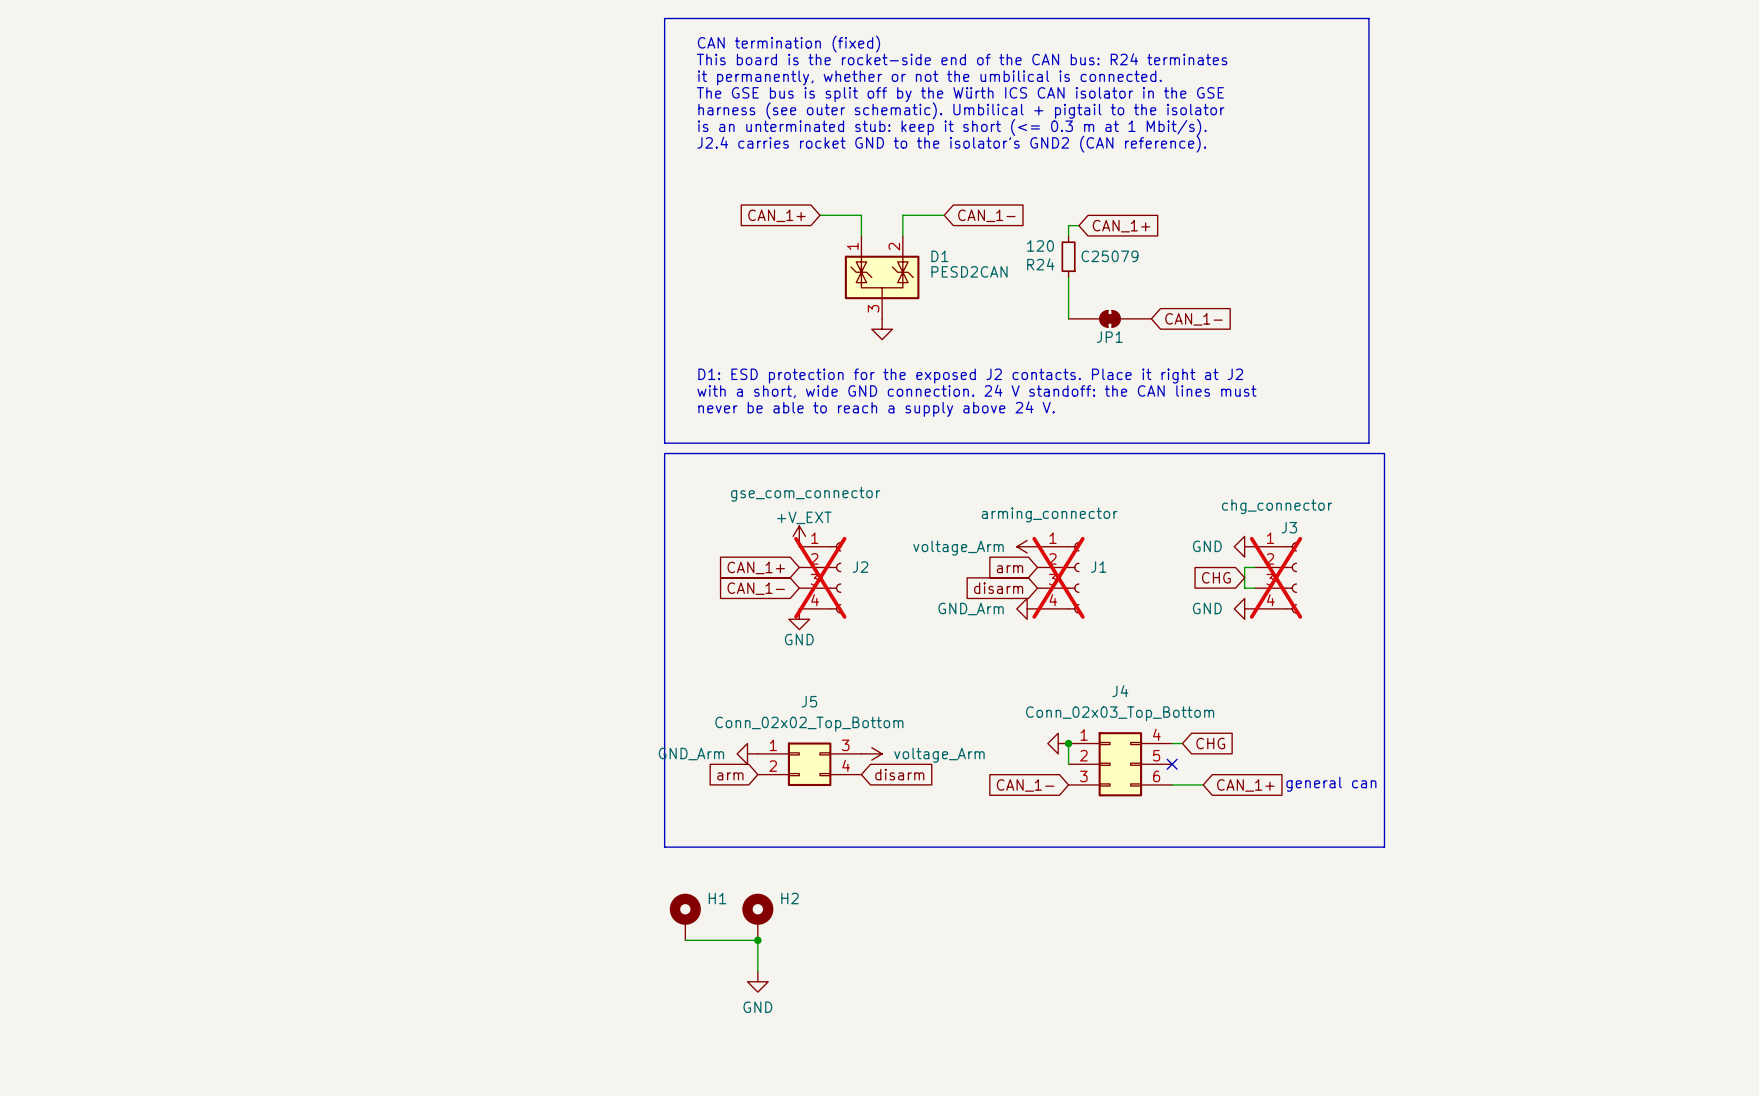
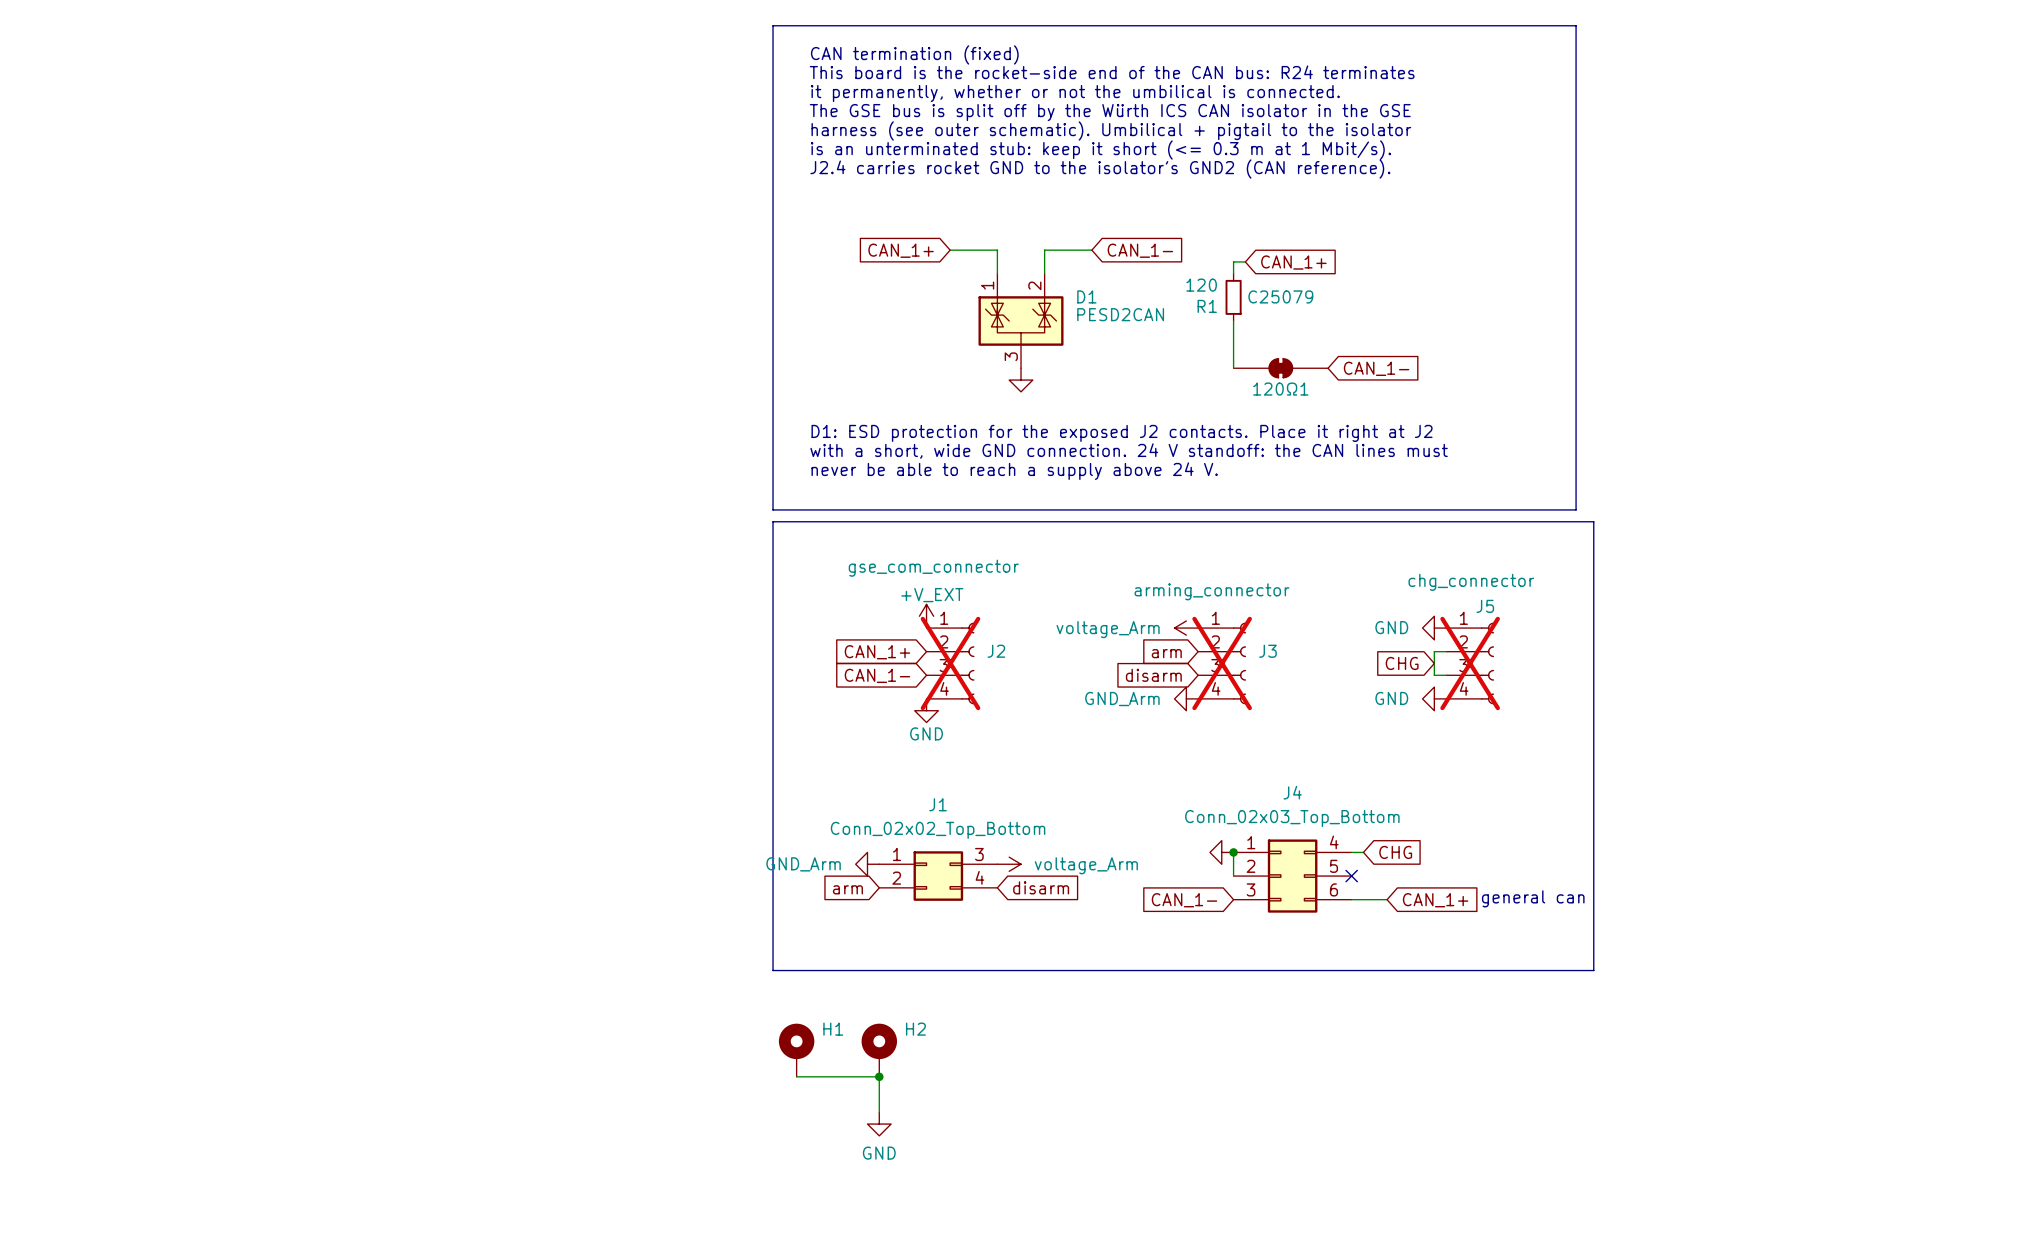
R24 name: R24 (1040, 264) -> R1 (1207, 306)
JP1 name: JP1 (1109, 337) -> 120Ω1 (1280, 389)
J3 name: J3 (1289, 527) -> J5 (1485, 606)
J1 name: J1 (1098, 567) -> J3 (1267, 651)
J5 name: J5 (809, 701) -> J1 (938, 804)

